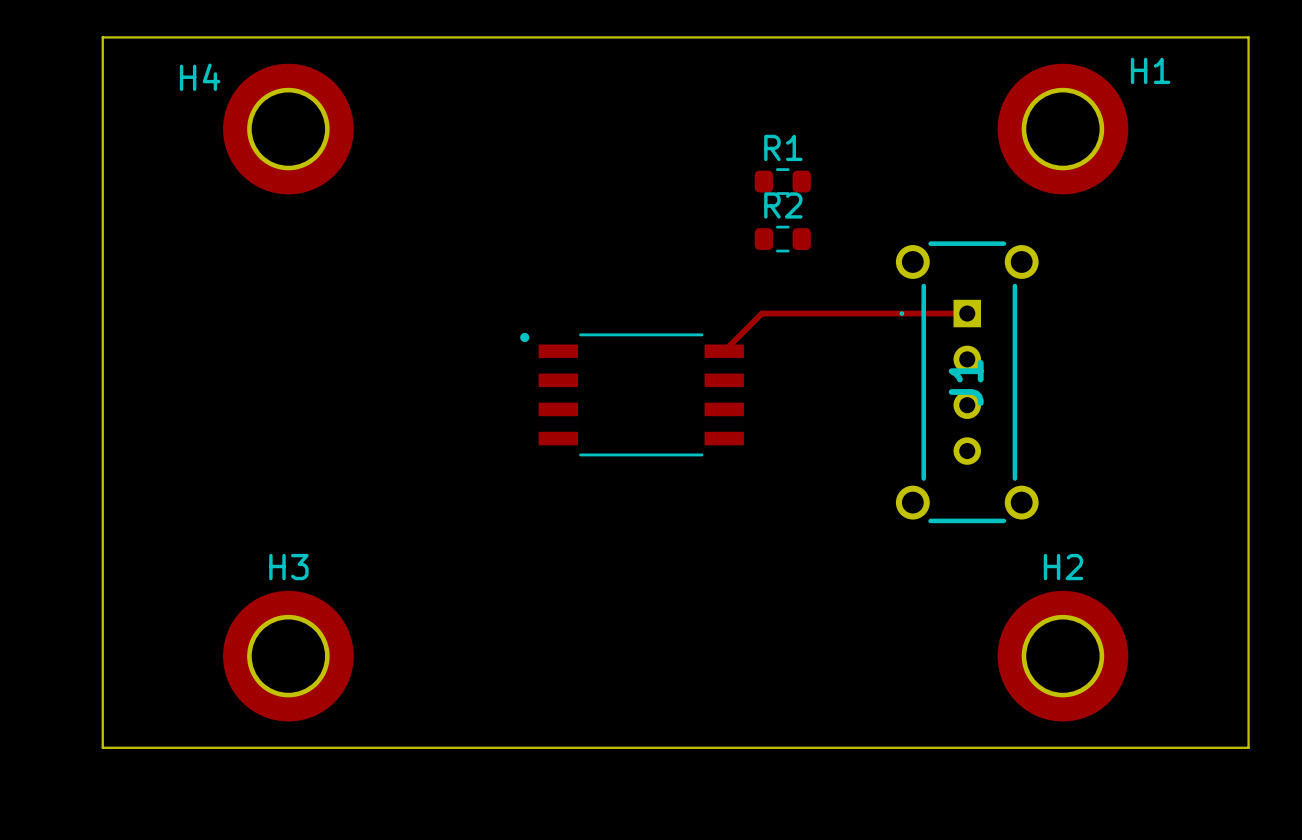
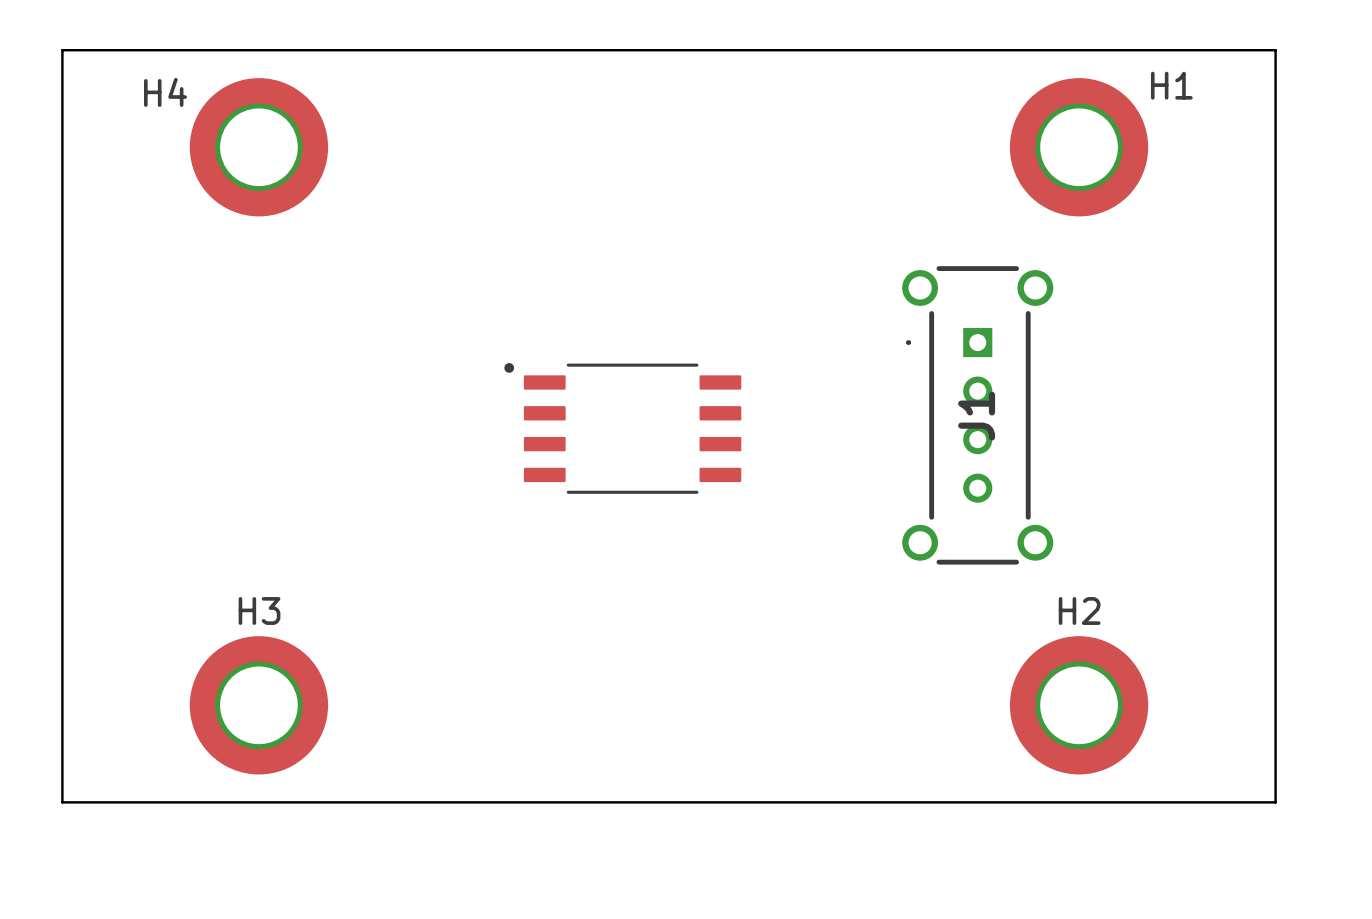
R1: (782, 181) -> none
R2: (782, 239) -> none
track: (967, 313) (761, 313) (724, 351) -> none

